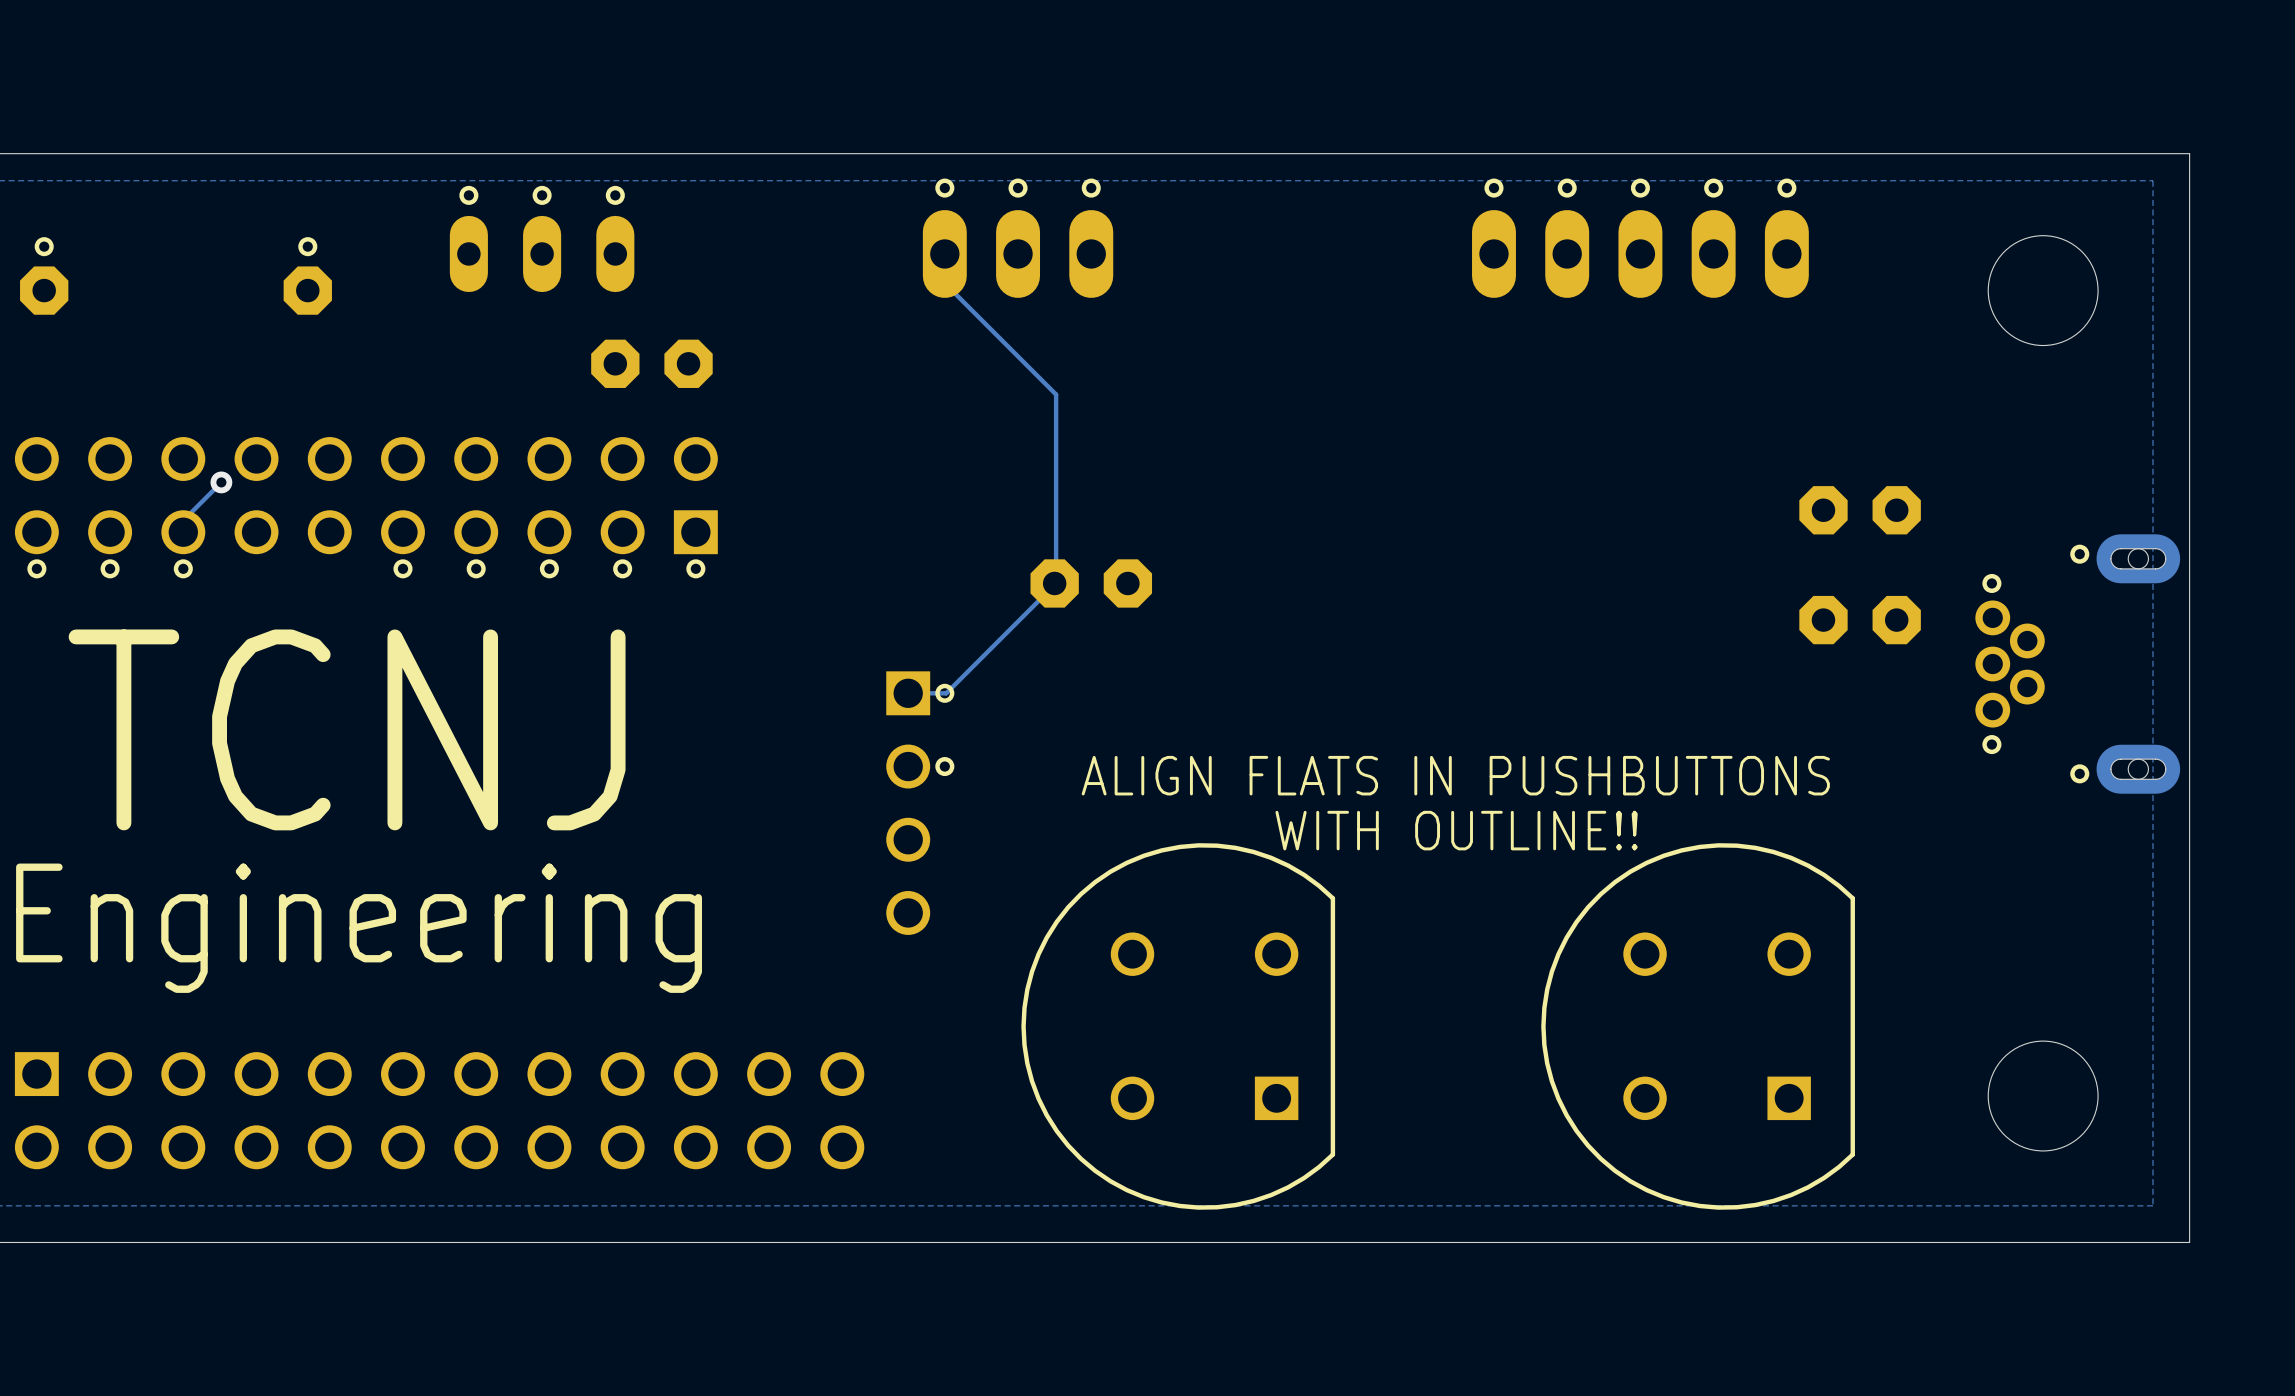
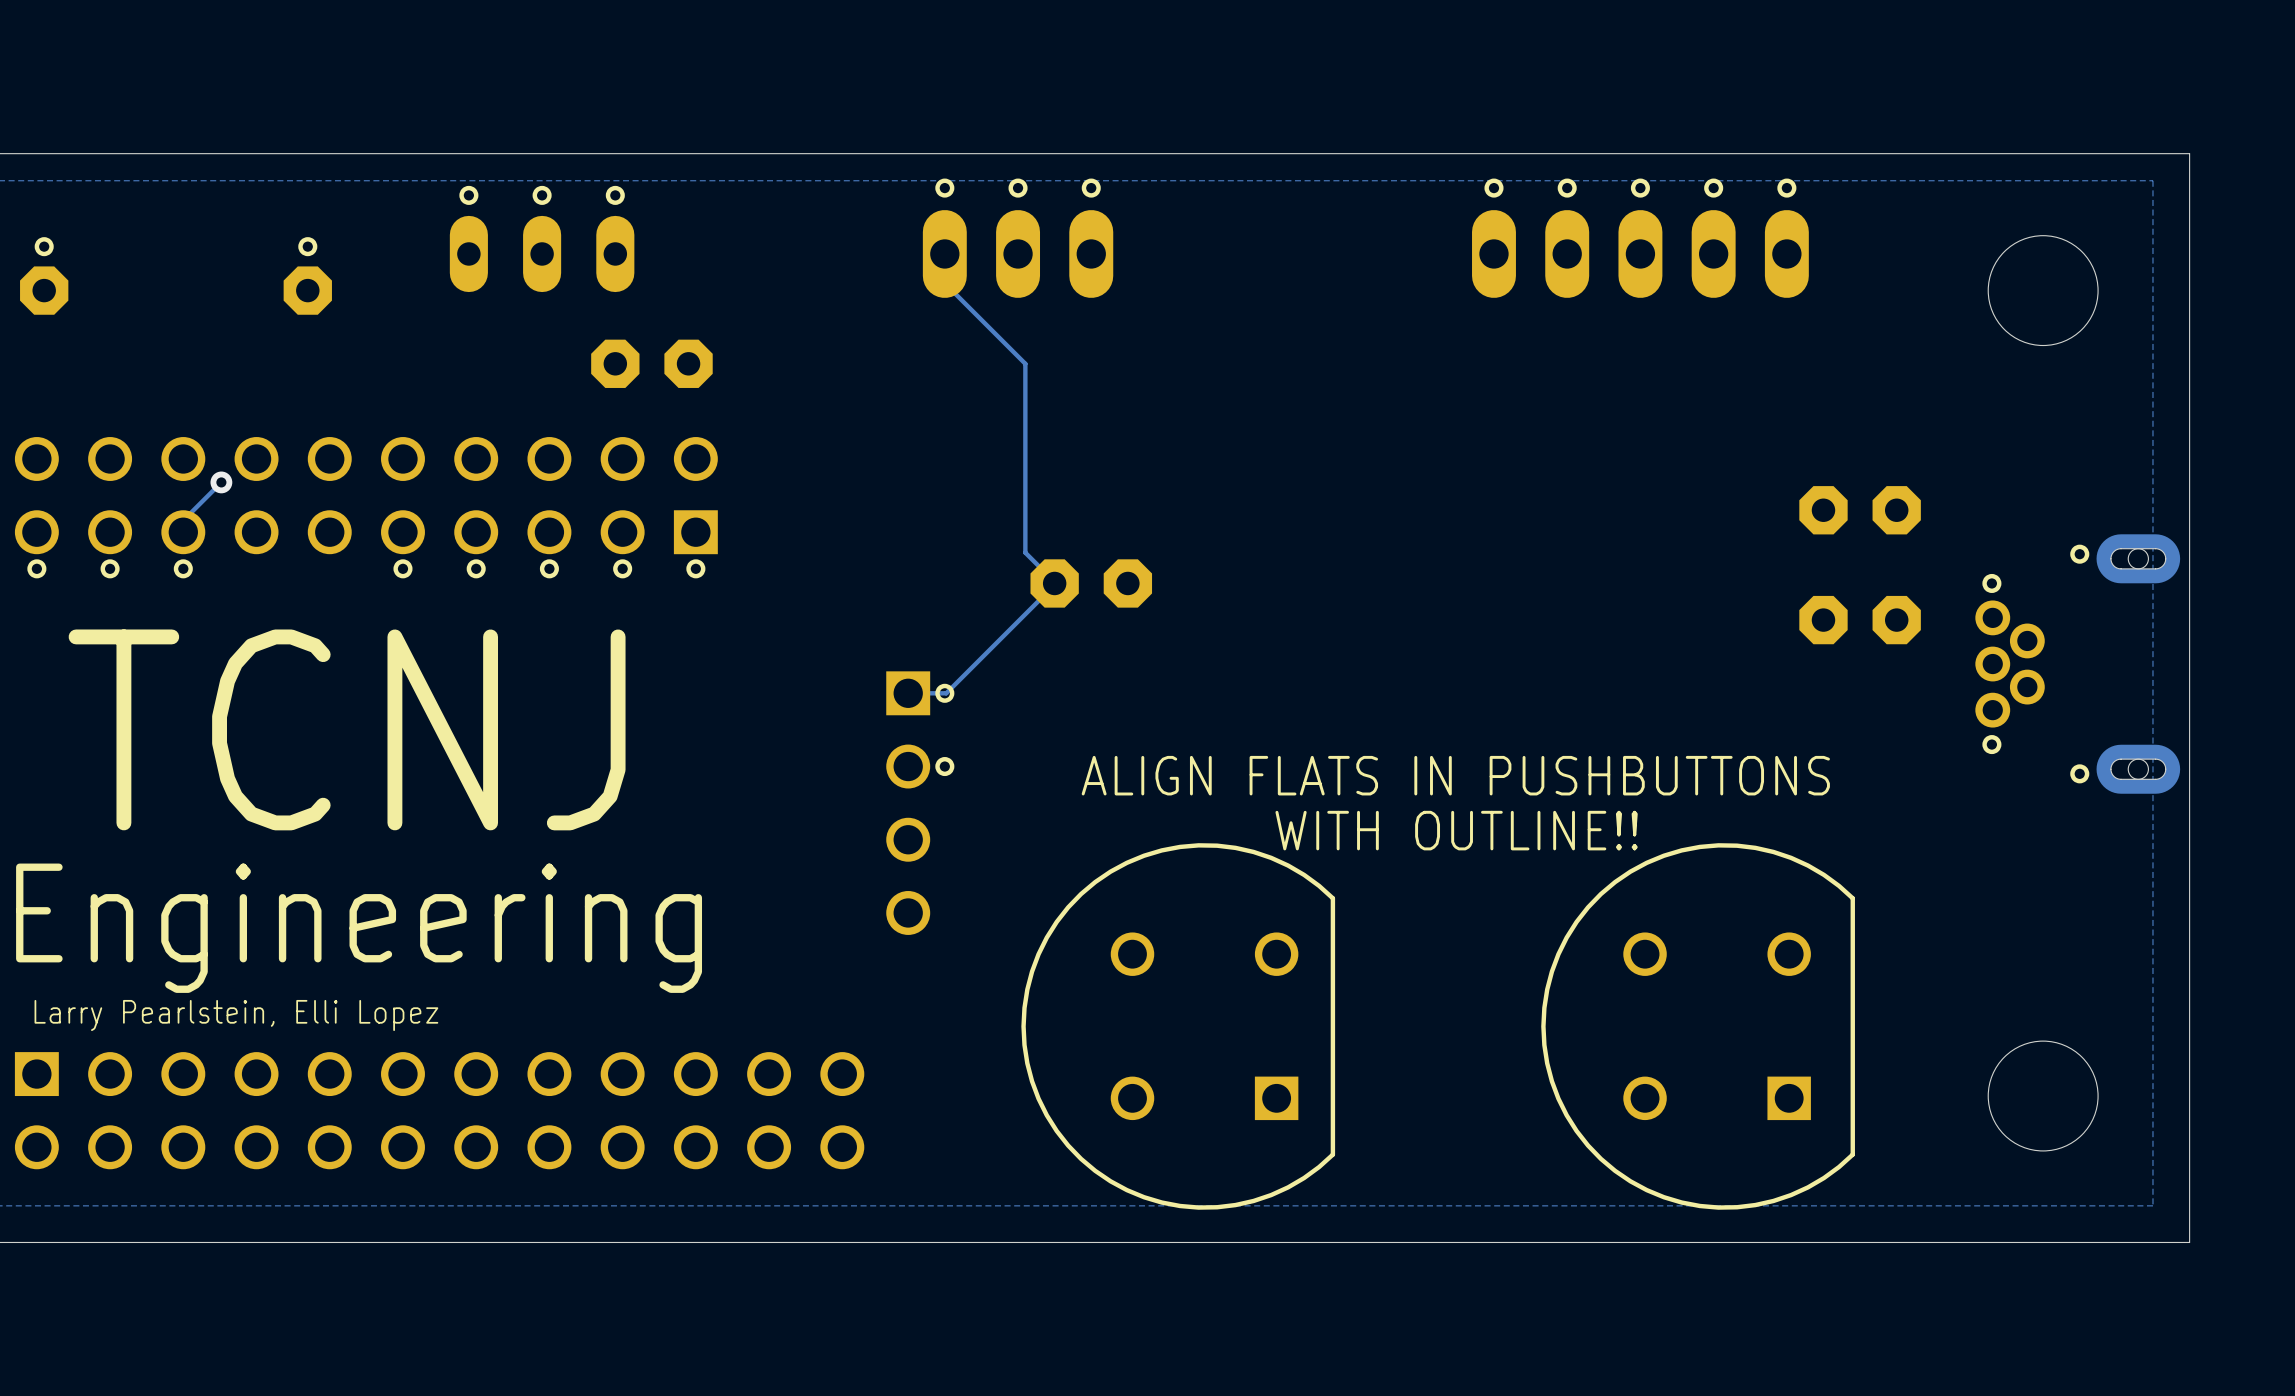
track: (1025, 363) (1056, 394) (1056, 583) -> (1025, 363) (1025, 552) (1056, 583)
text: none -> Larry Pearlstein, Elli Lopez (236, 1015)

